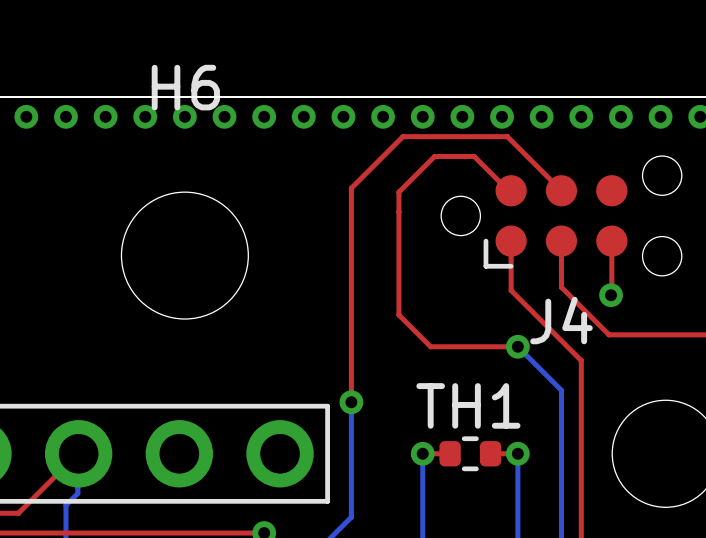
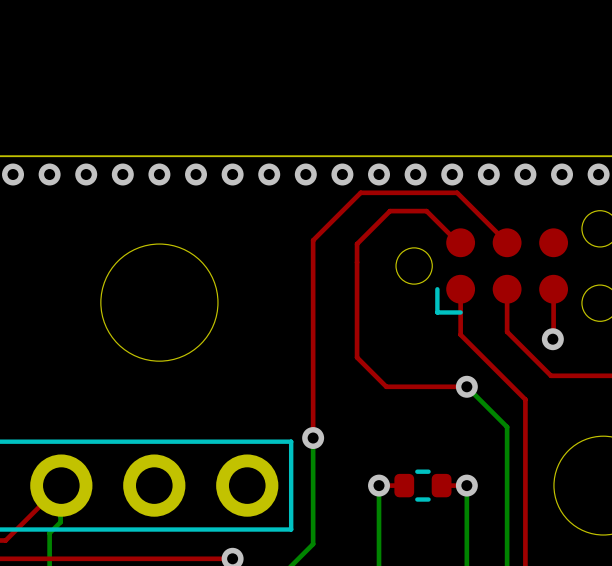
H6 name: H6 (185, 87) -> none
J4 name: J4 (561, 320) -> none
TH1 name: TH1 (468, 405) -> none

